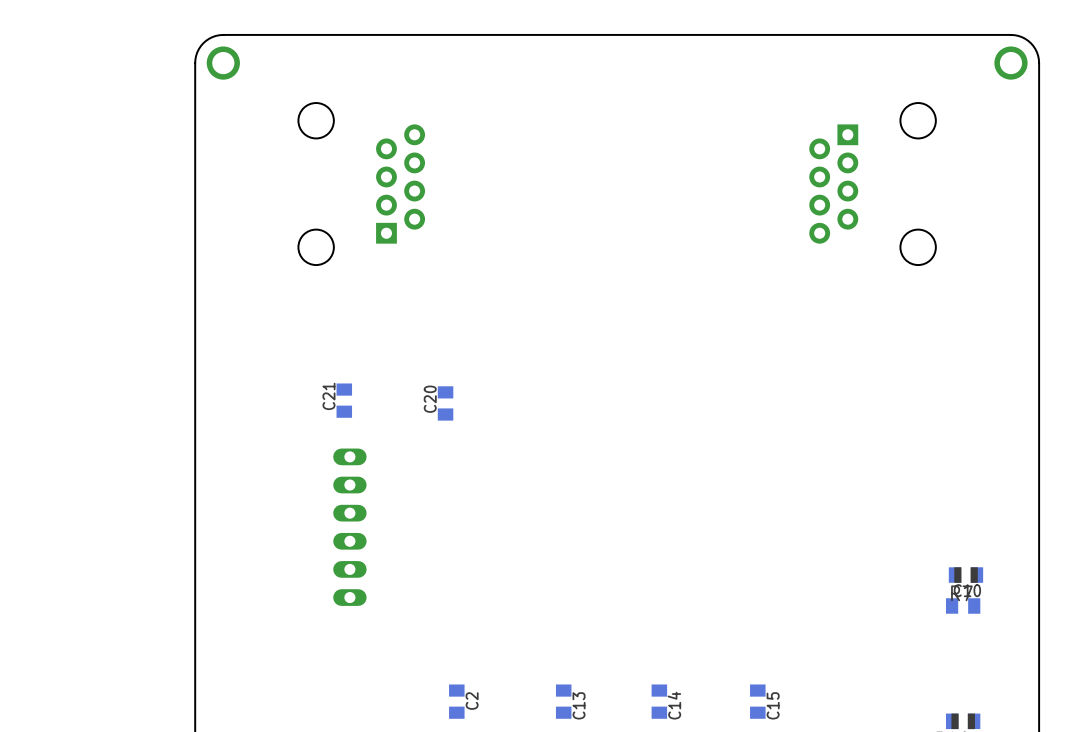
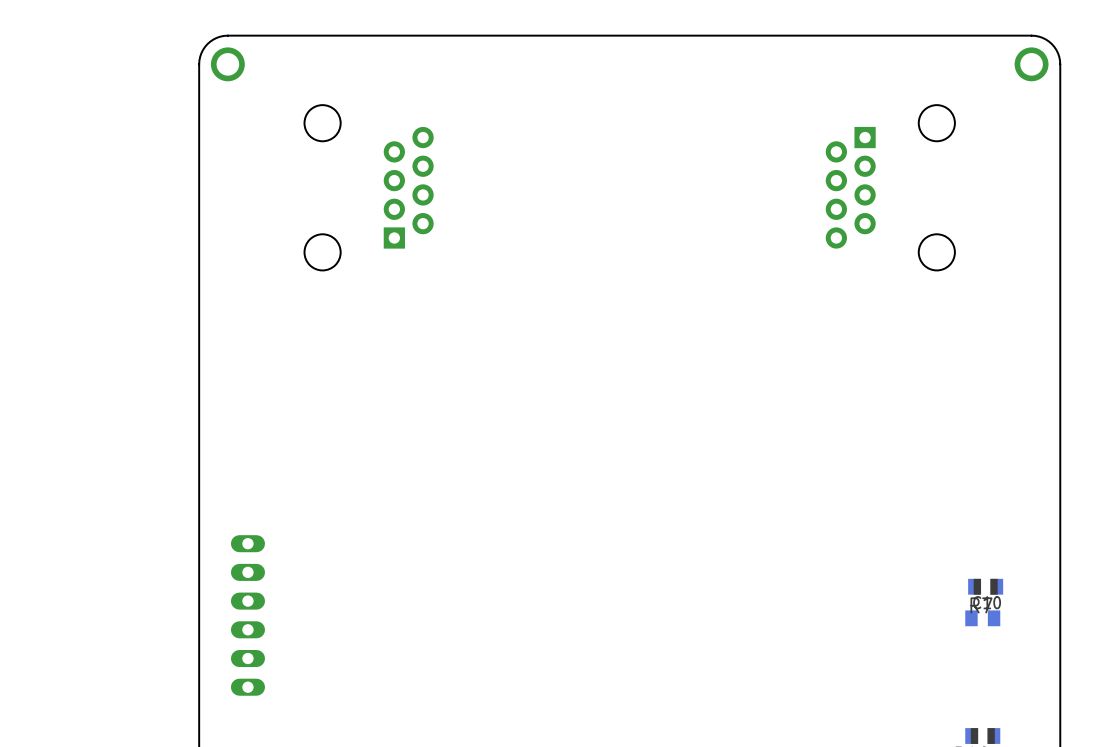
C21: (344, 400) -> none
C20: (445, 403) -> none
part position: (349, 527) -> (247, 615)
C2: (456, 701) -> none
C13: (563, 701) -> none
C14: (659, 701) -> none
C15: (757, 701) -> none

